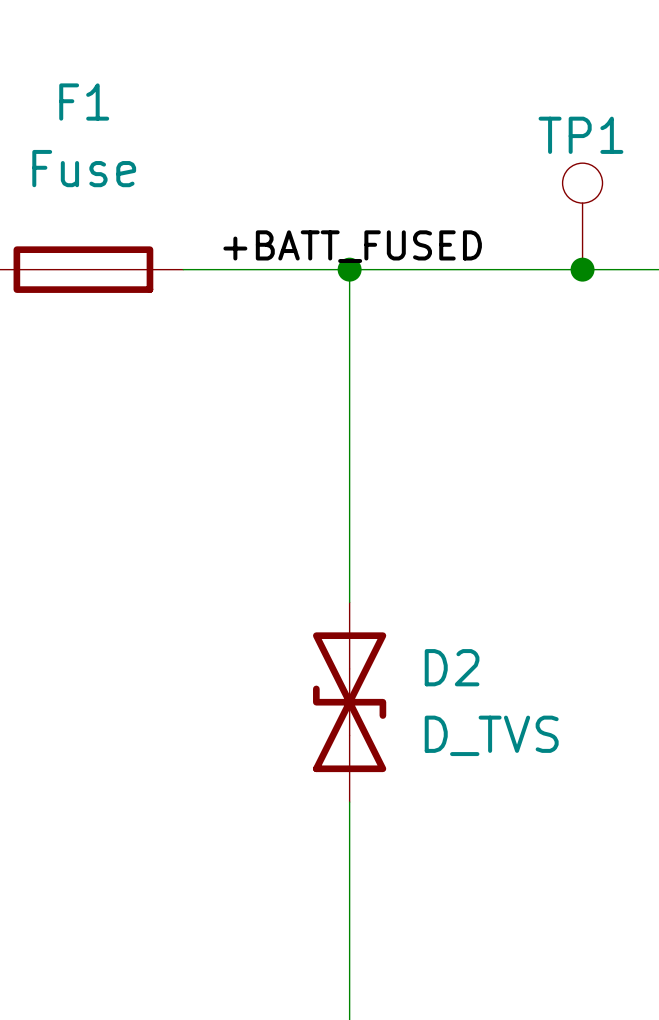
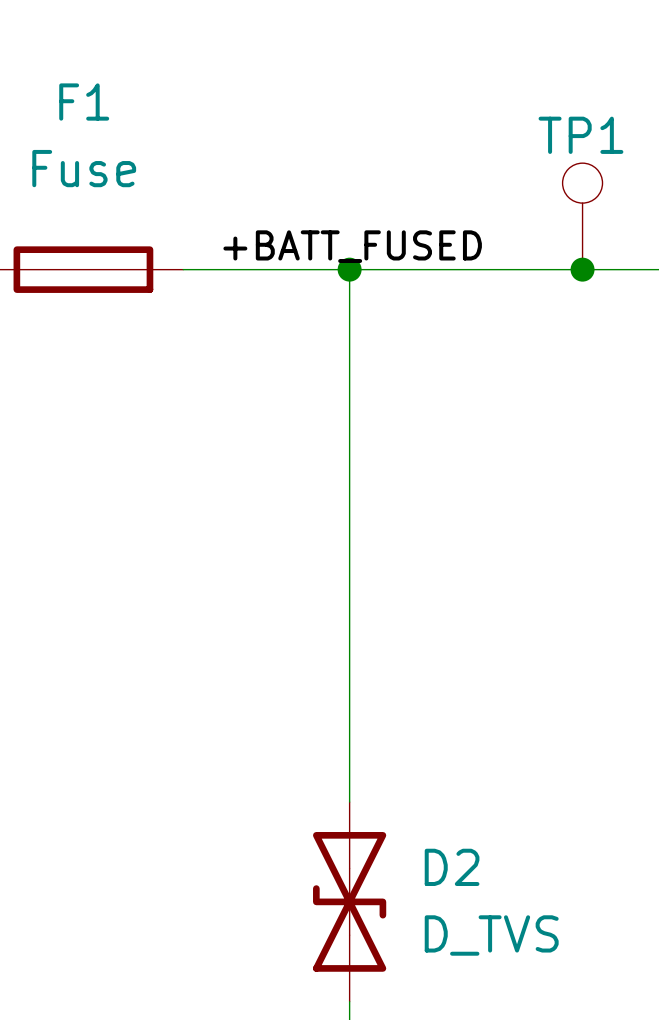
D2 position: (349, 702) -> (349, 901)

